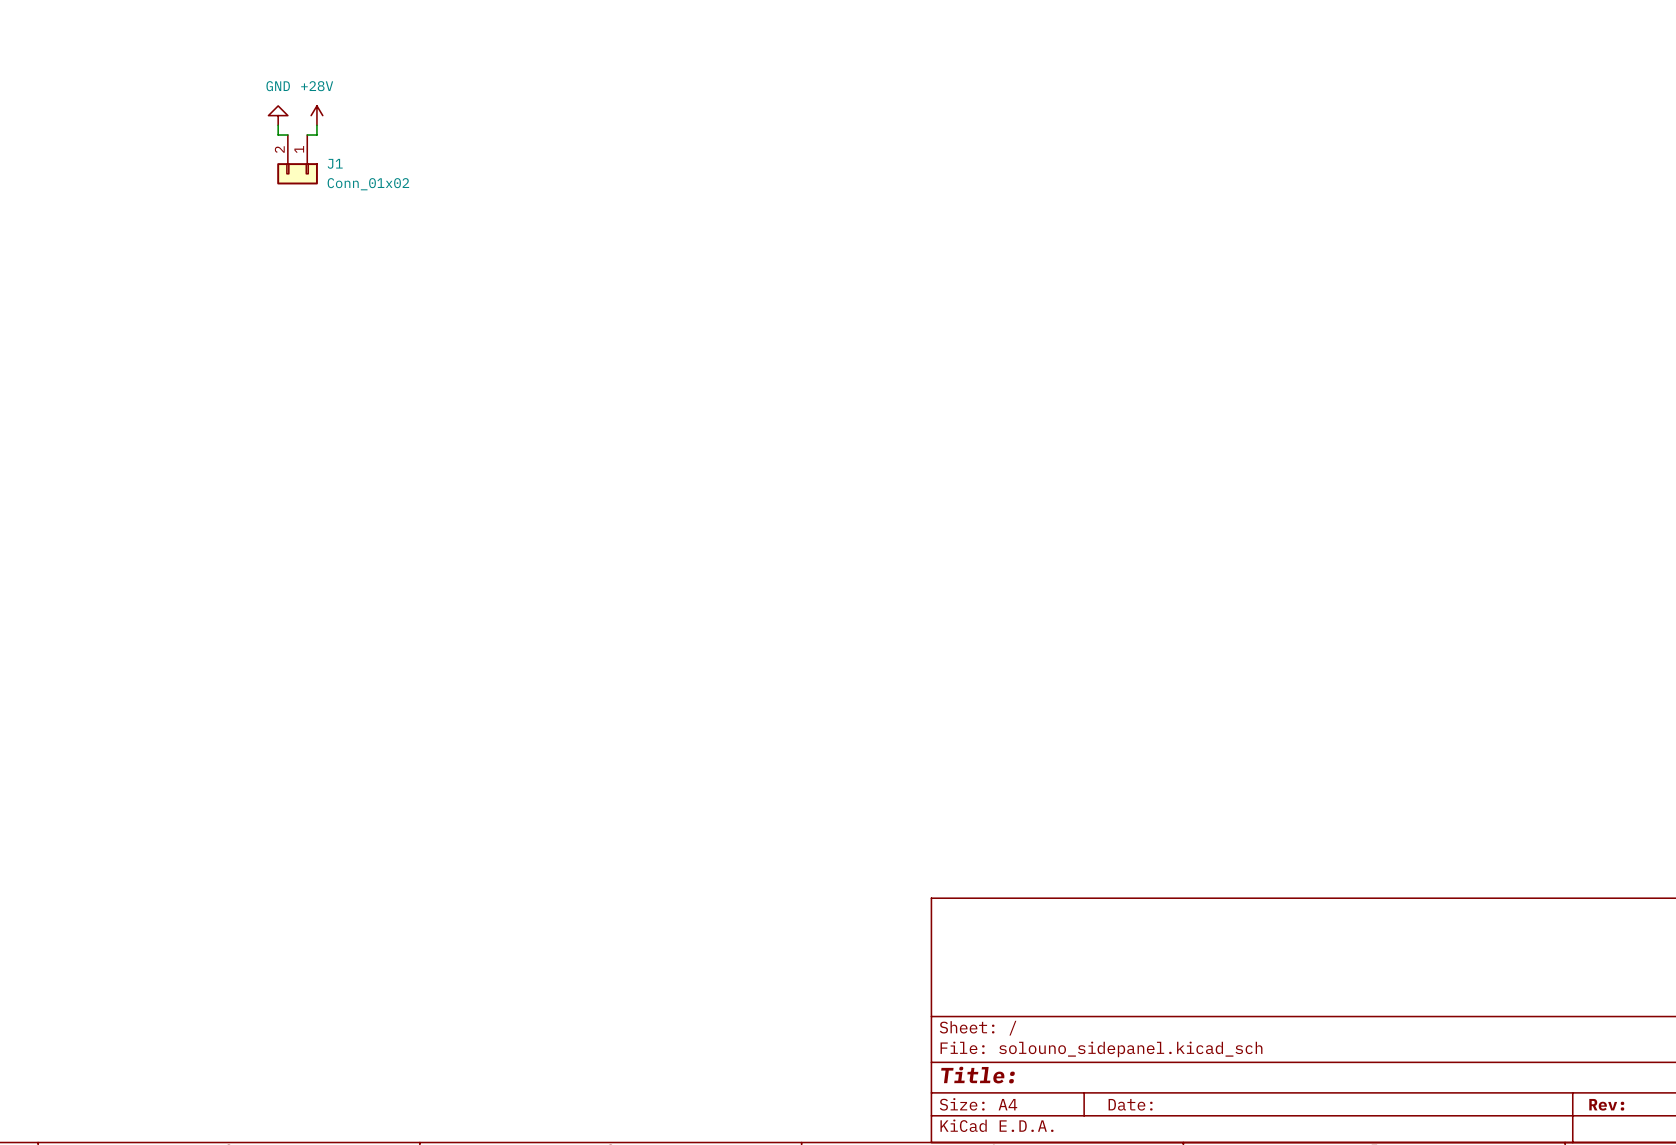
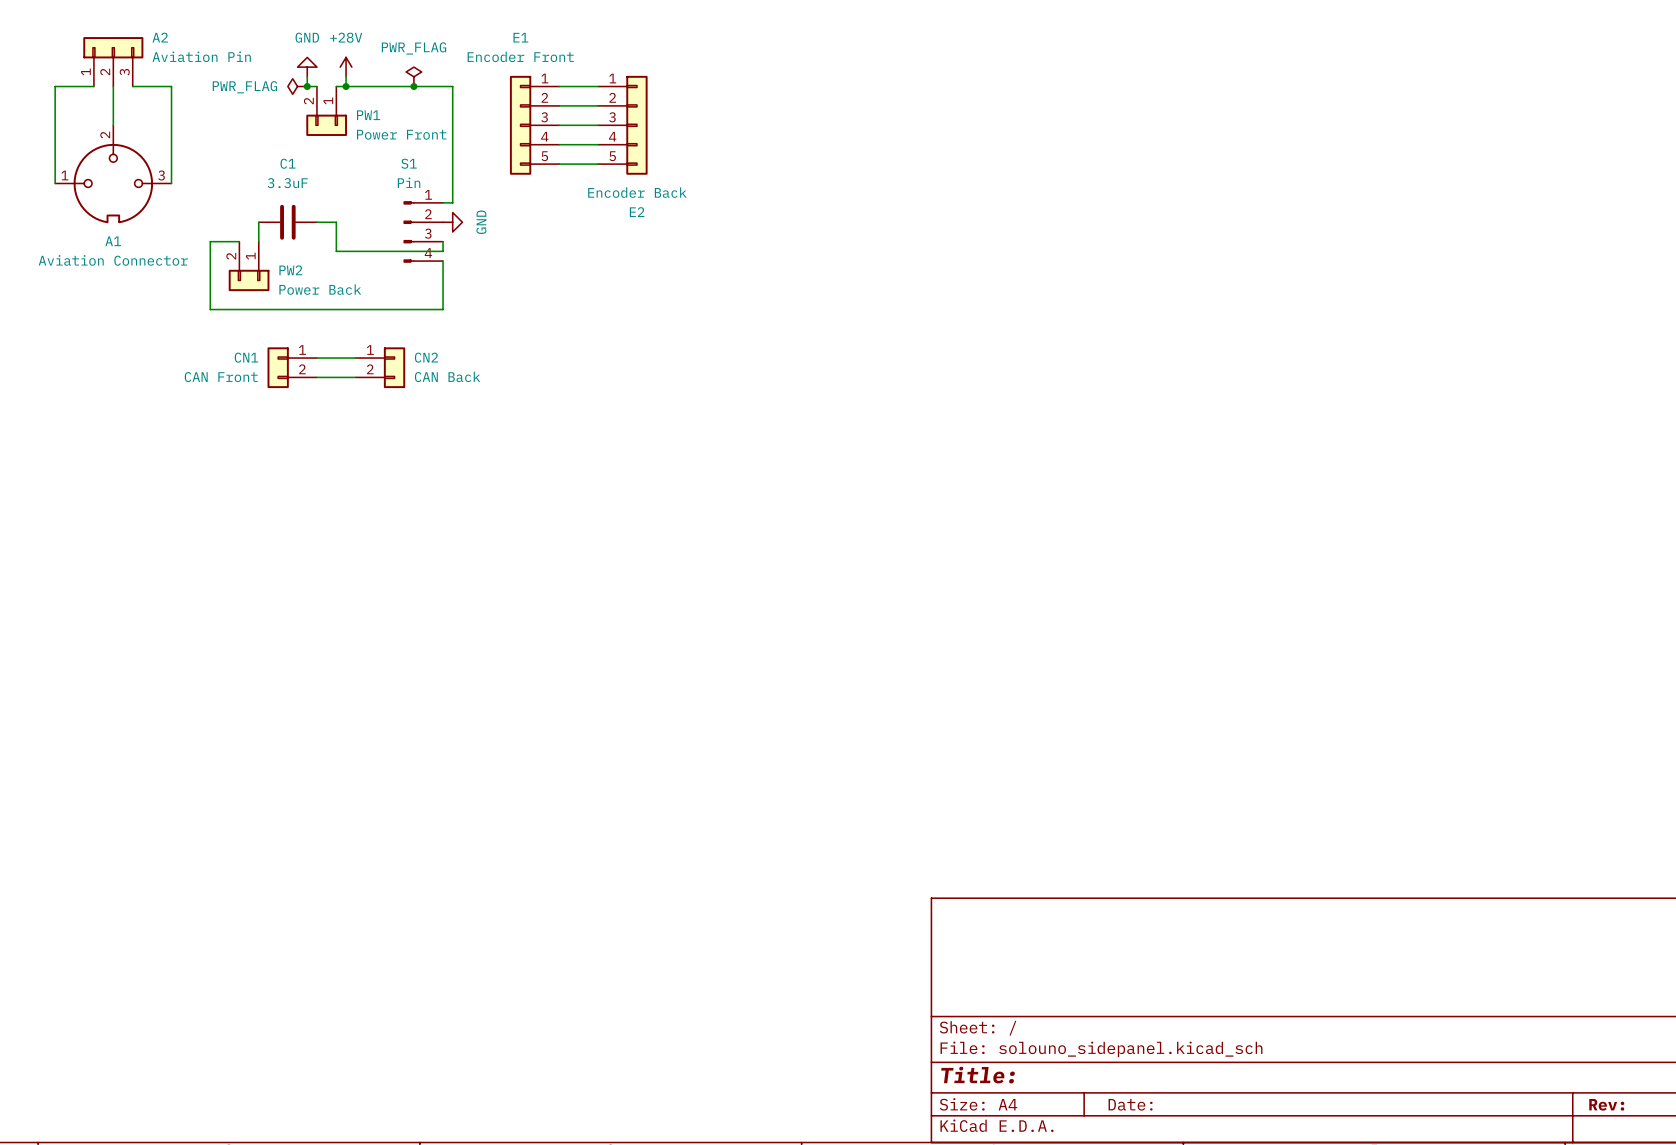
A2: none -> Aviation Pin (113, 61)
wire: none -> (346, 76) (346, 86)
power symbol: none -> PWR_FLAG (413, 76)
wire: none -> (93, 86) (55, 86) (55, 183)
wire: none -> (113, 86) (113, 125)
wire: none -> (132, 86) (171, 86) (171, 183)
power symbol: none -> PWR_FLAG (297, 86)
junction: none -> (307, 86)
wire: none -> (336, 86) (452, 86) (452, 202) (443, 202)
junction: none -> (346, 86)
junction: none -> (413, 86)
wire: none -> (559, 86) (598, 86)
wire: none -> (559, 105) (598, 105)
PW1: none -> Power Front (326, 111)
power symbol position: GND (278, 115) -> GND (307, 67)
power symbol position: +28V (316, 115) -> +28V (346, 67)
wire: (278, 125) (278, 135) (287, 135) -> (307, 76) (307, 86) (316, 86)
E1: none -> Encoder Front (534, 125)
wire: none -> (559, 125) (598, 125)
E2: none -> Encoder Back (622, 125)
wire: none -> (559, 144) (598, 144)
J1: Conn_01x02 (297, 159) -> none
wire: none -> (559, 164) (598, 164)
A1: none -> Aviation Connector (113, 174)
wire: none -> (258, 222) (258, 241)
C1: none -> 3.3uF (287, 222)
wire: none -> (316, 222) (336, 222) (336, 251) (443, 251) (443, 241)
power symbol: none -> GND (452, 222)
S1: none -> Pin (423, 231)
wire: none -> (239, 241) (210, 241) (210, 309) (443, 309) (443, 261)
PW2: none -> Power Back (249, 266)
wire: none -> (316, 358) (355, 358)
CN1: none -> CAN Front (292, 367)
CN2: none -> CAN Back (380, 367)
wire: none -> (316, 377) (355, 377)

